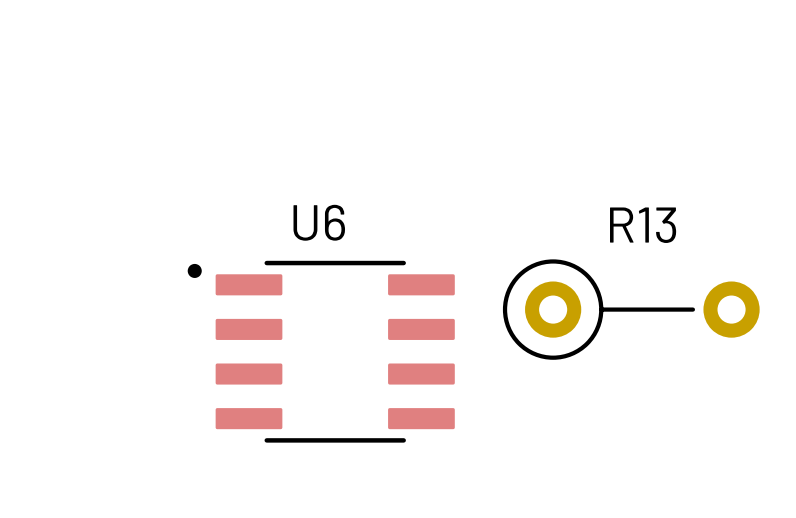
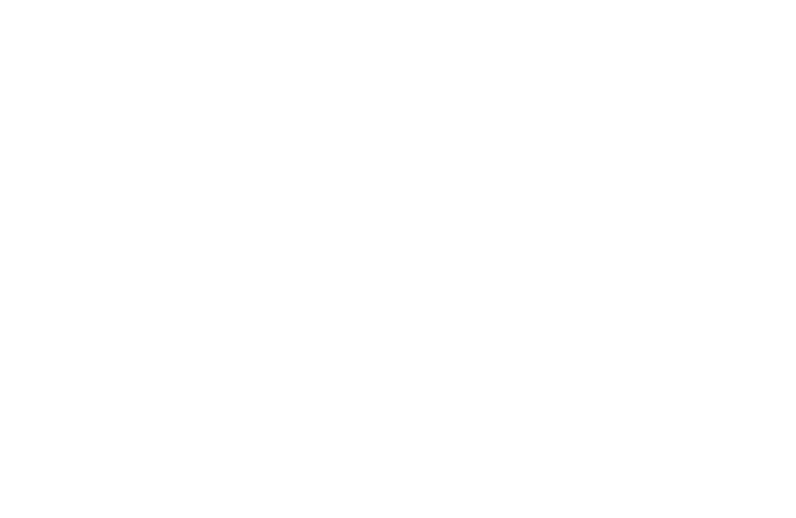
R13: (631, 309) -> none
U6: (321, 351) -> none

